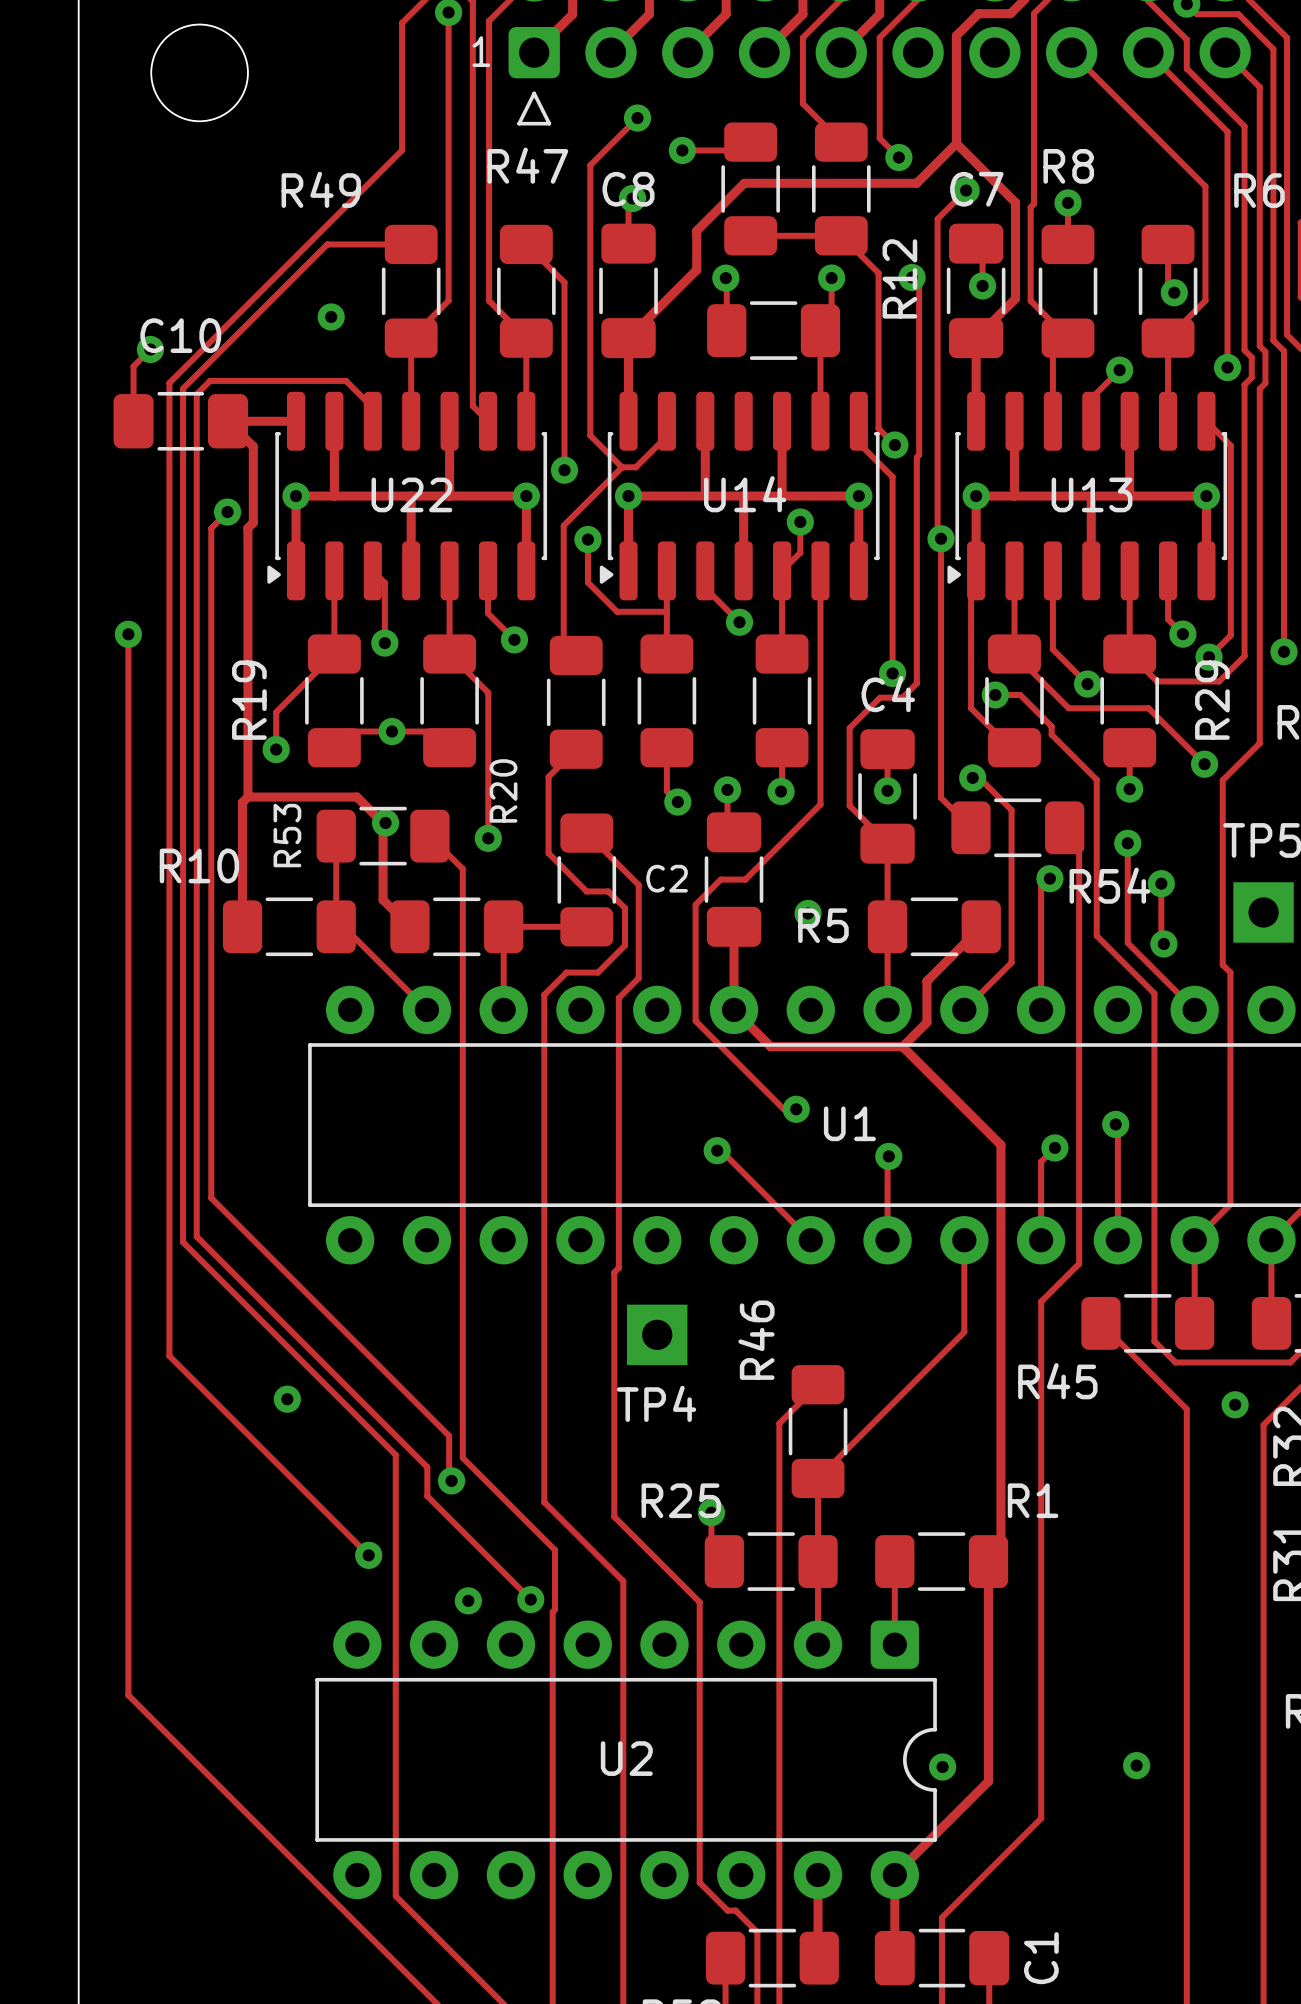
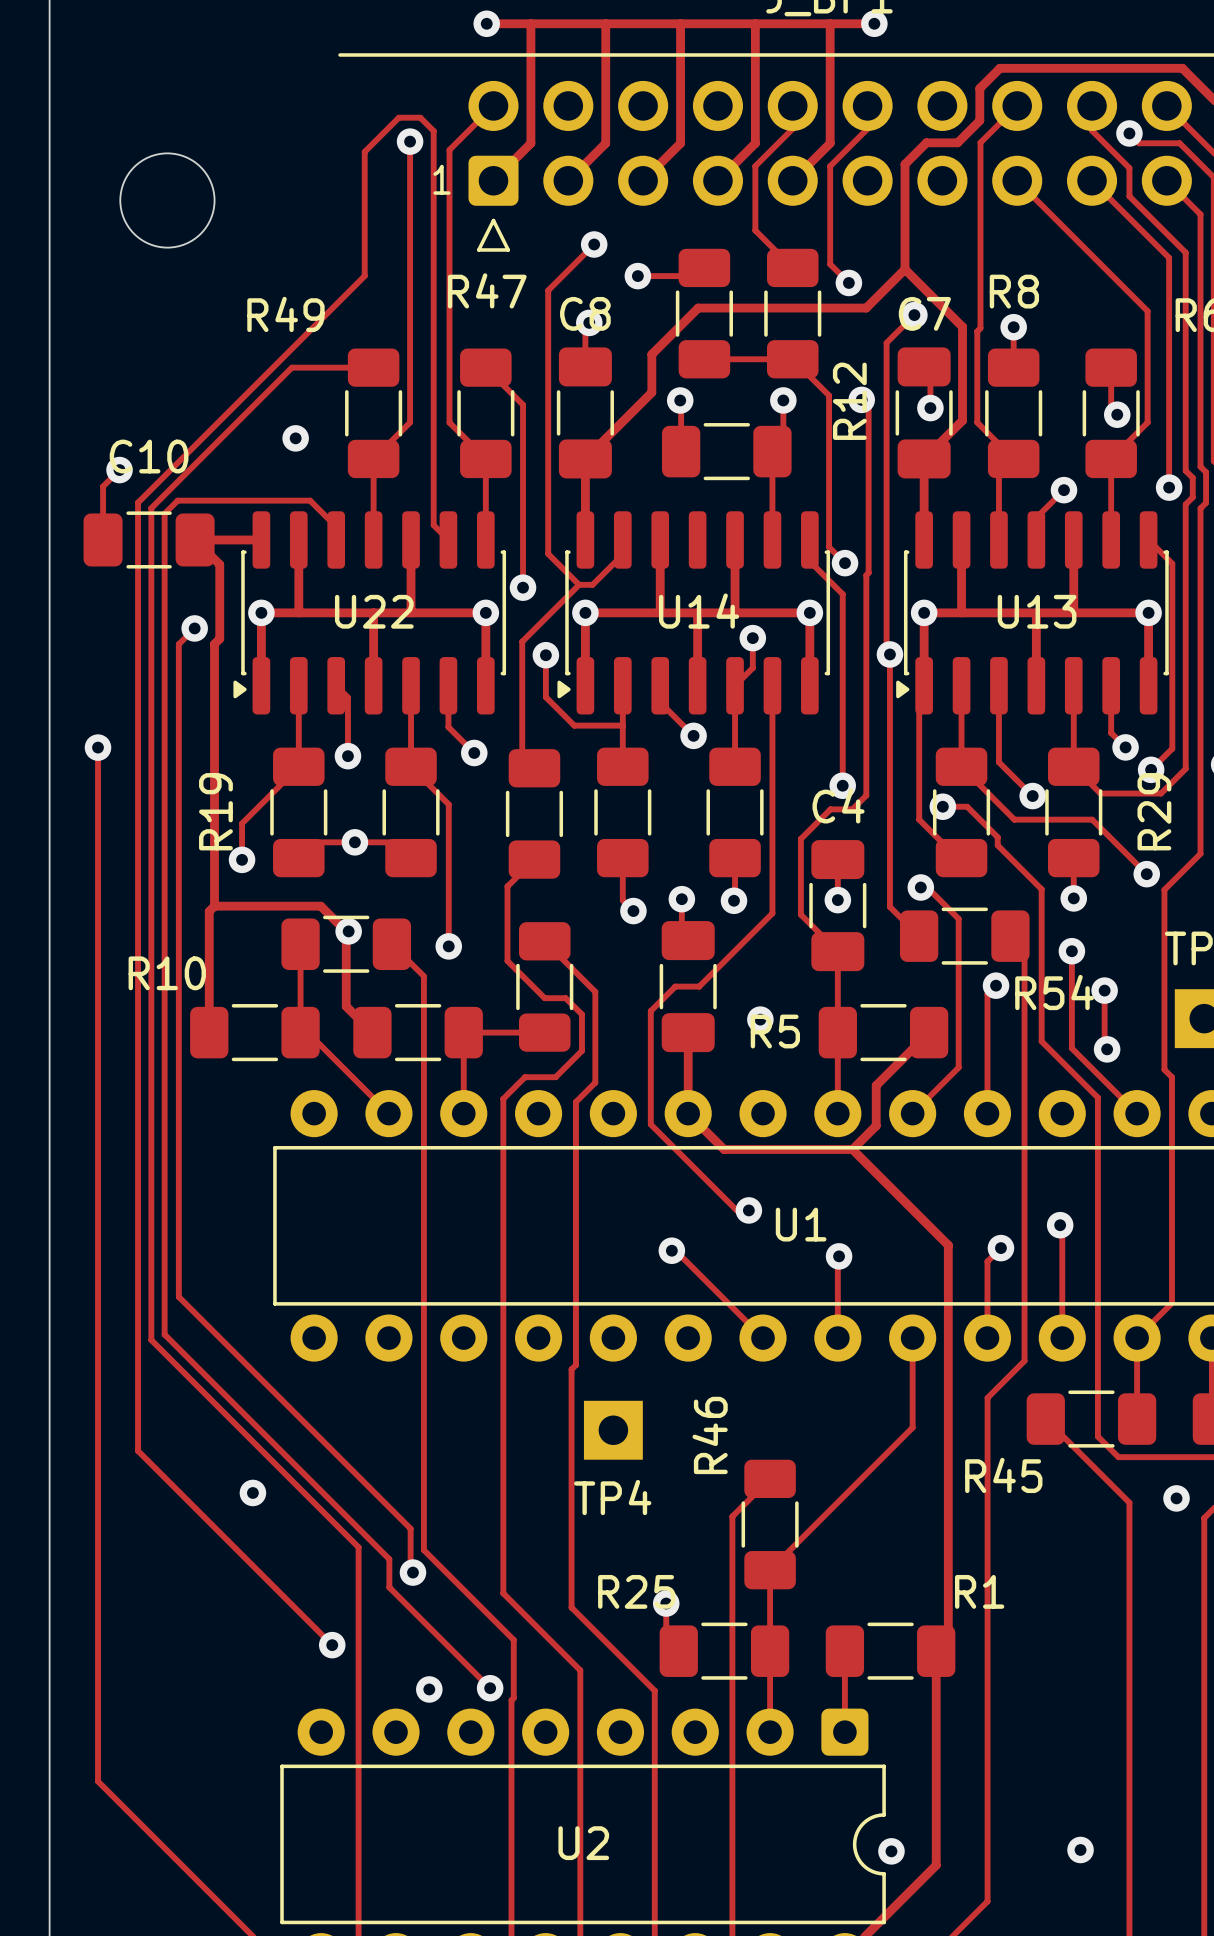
R20 name: R20 (503, 790) -> none
R53 name: R53 (287, 835) -> none
C2 name: C2 (667, 878) -> none

